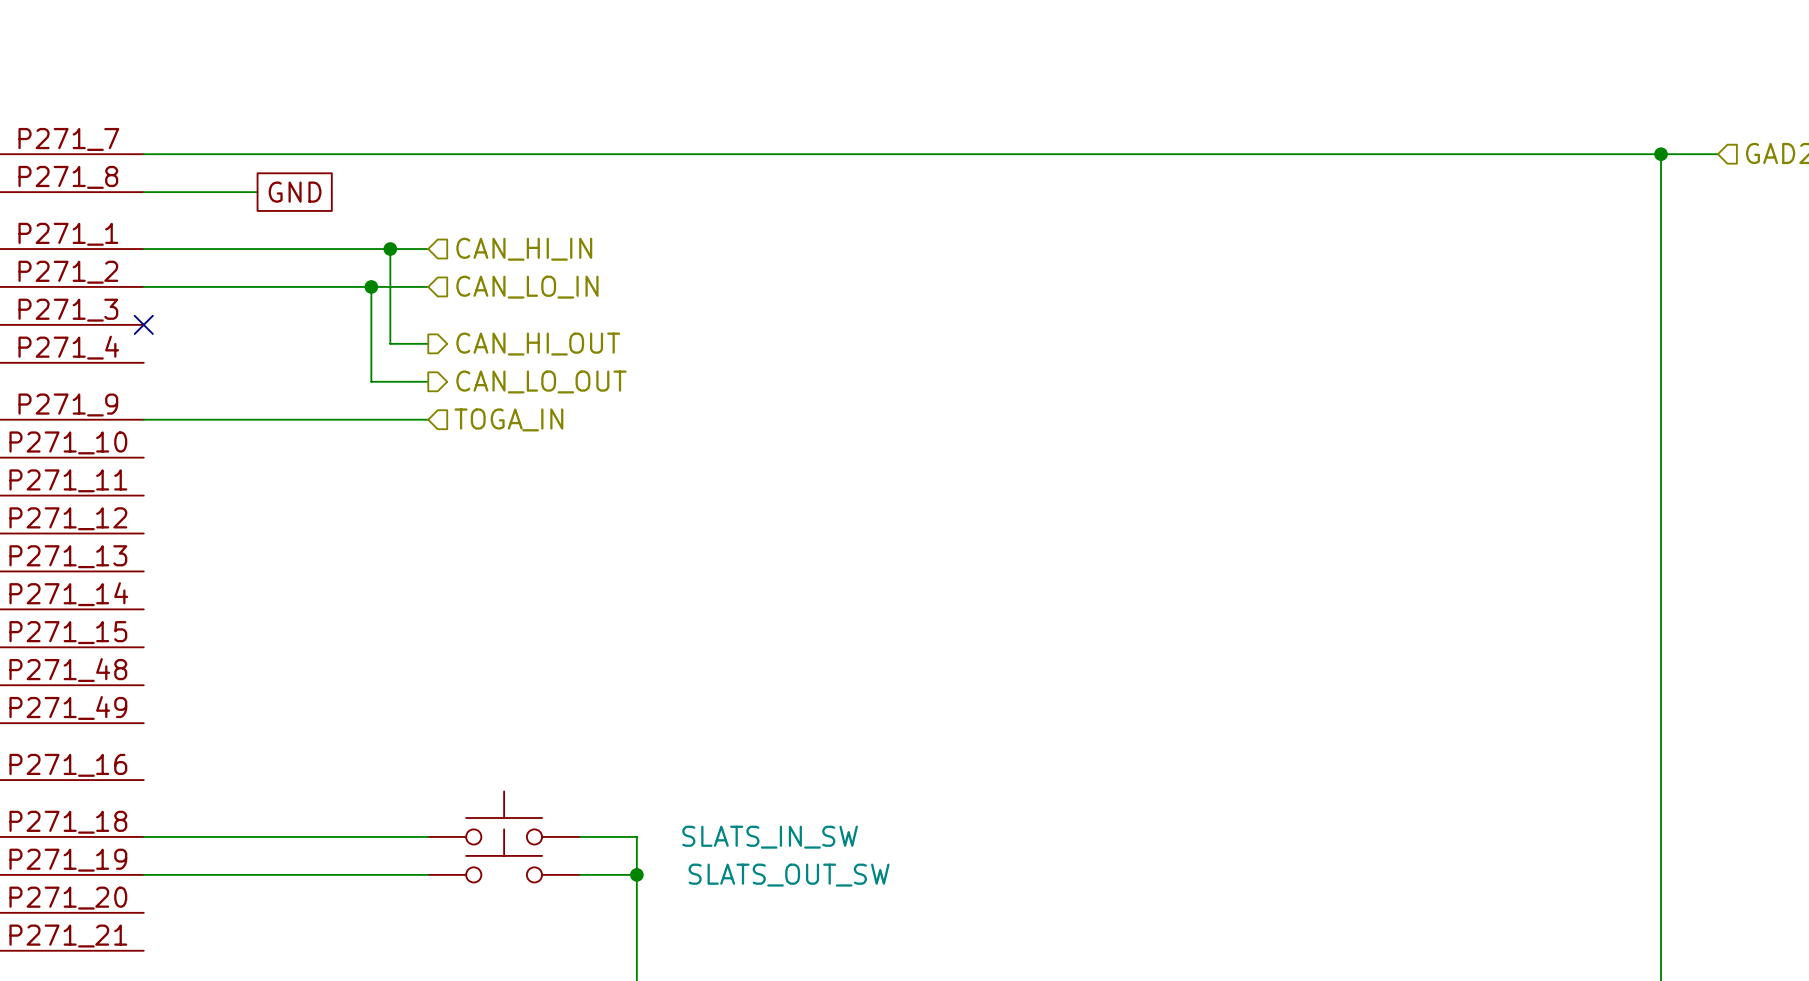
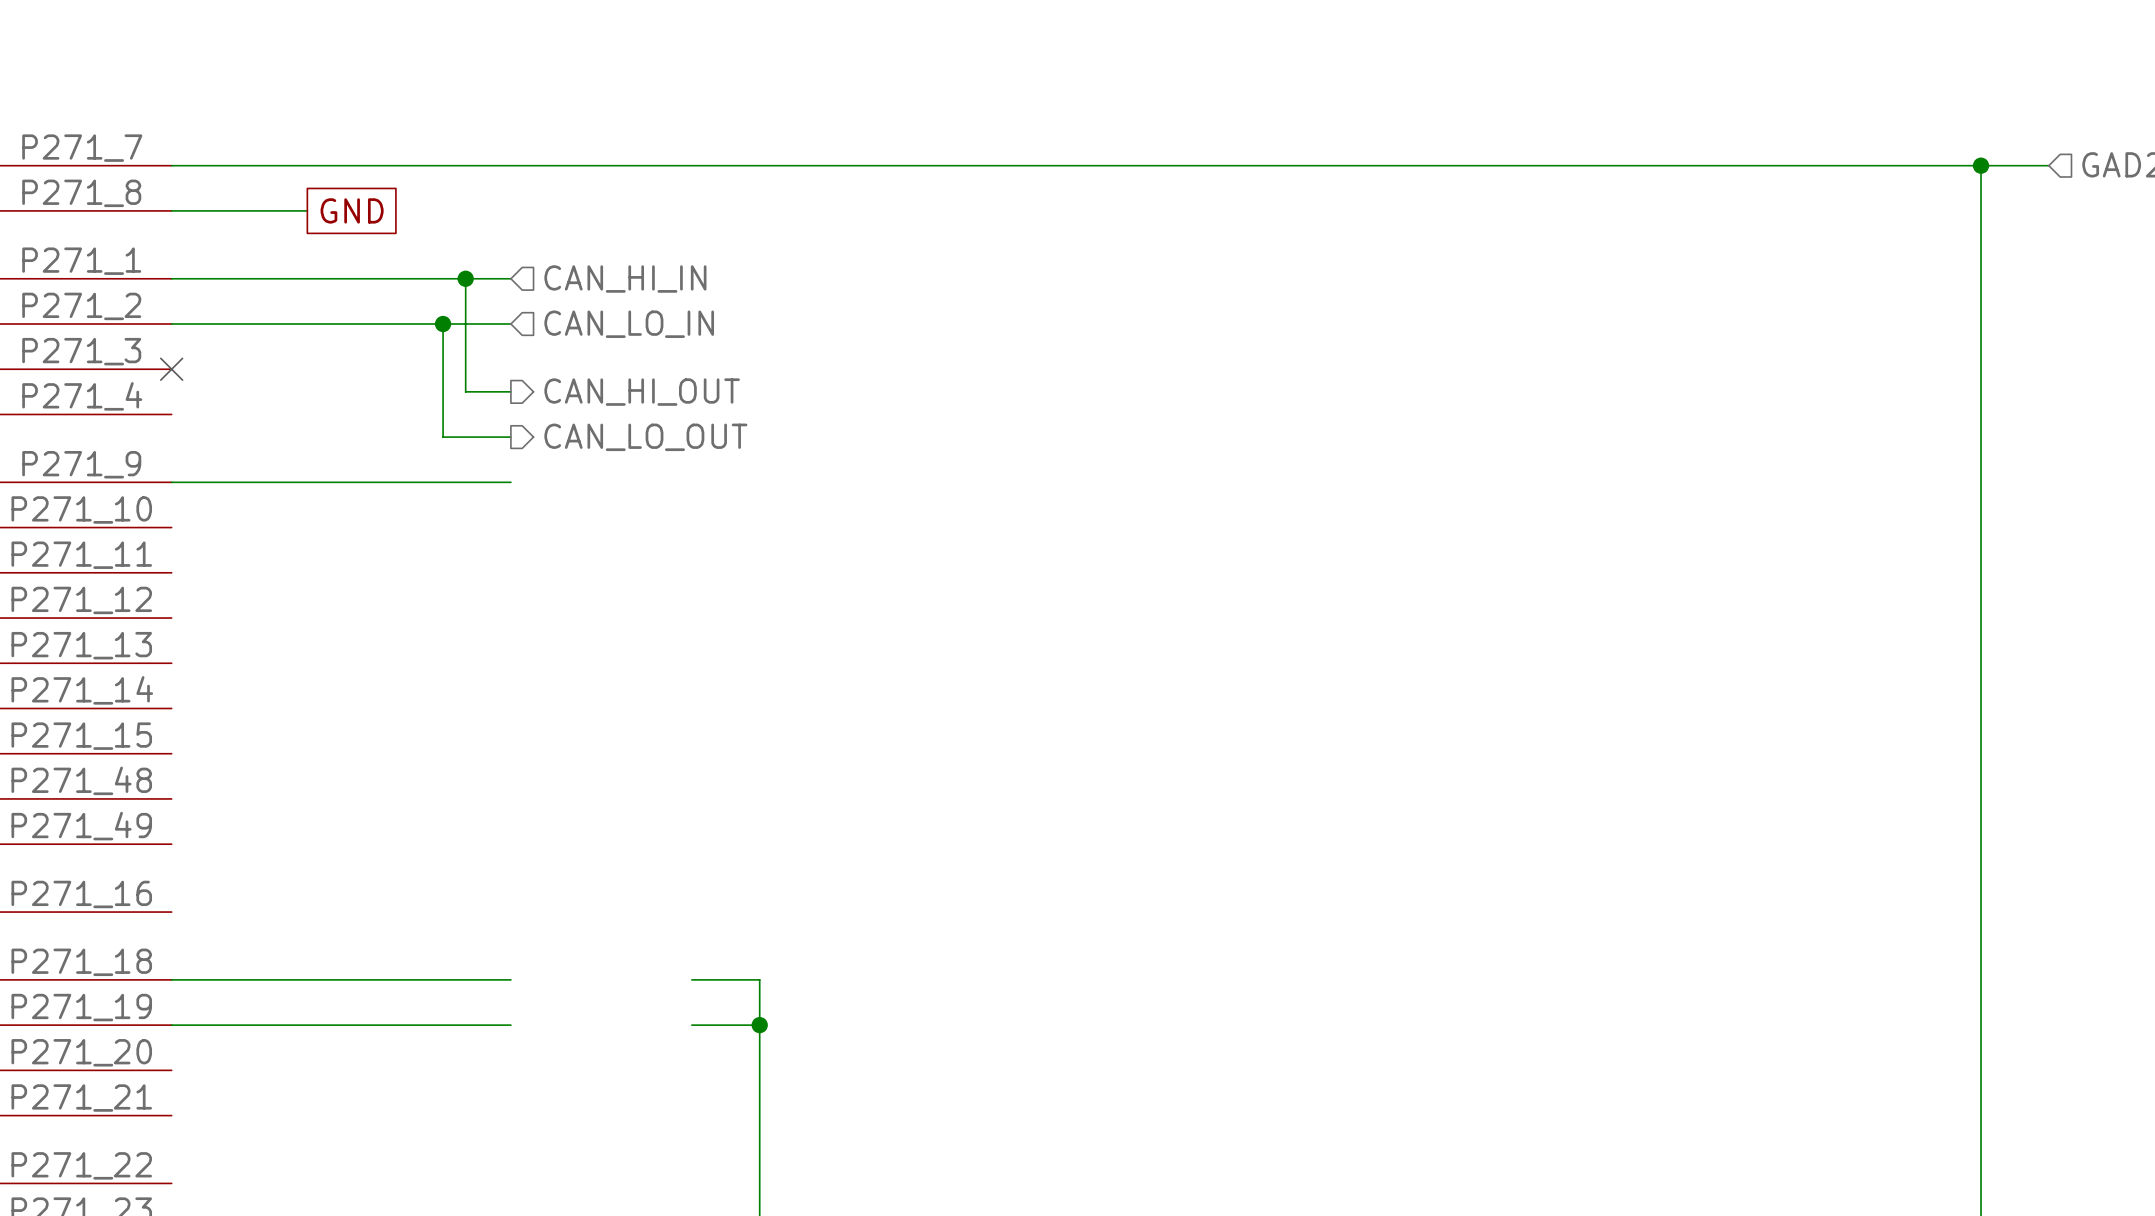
hierarchical label: TOGA_IN (508, 419) -> none
SLATS_IN_SW: (504, 818) -> none
SLATS_OUT_SW: (504, 855) -> none

